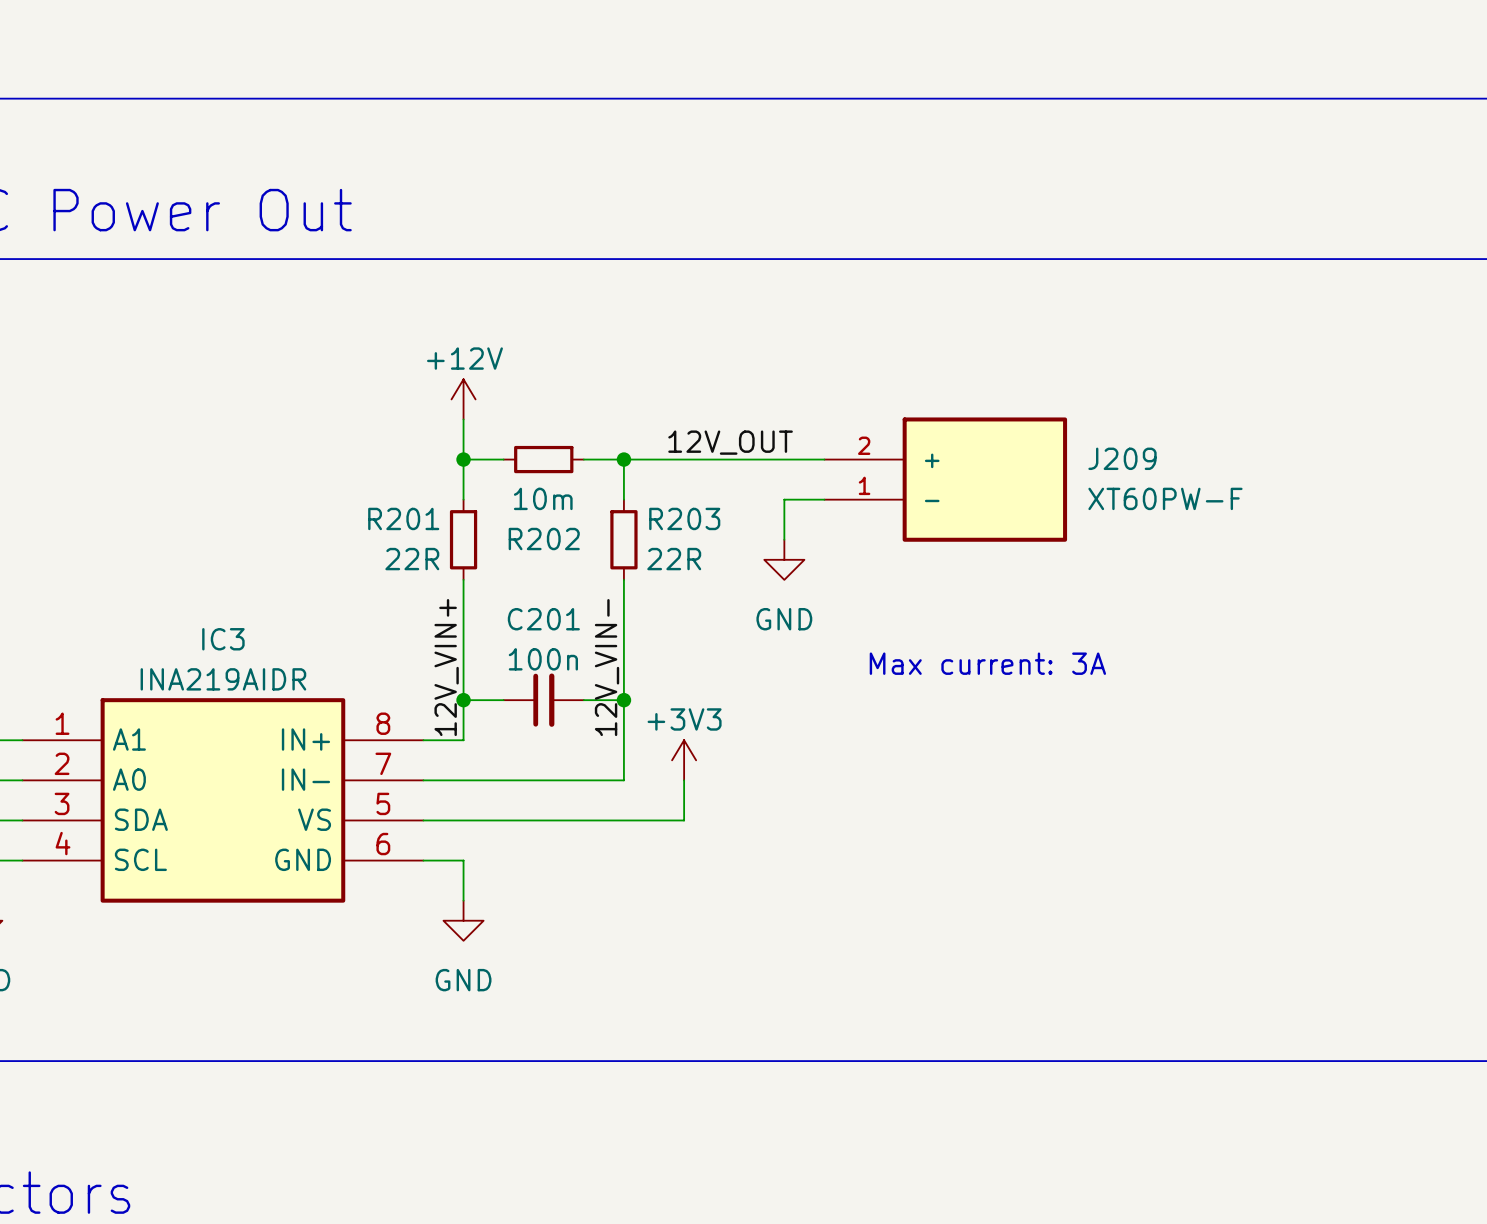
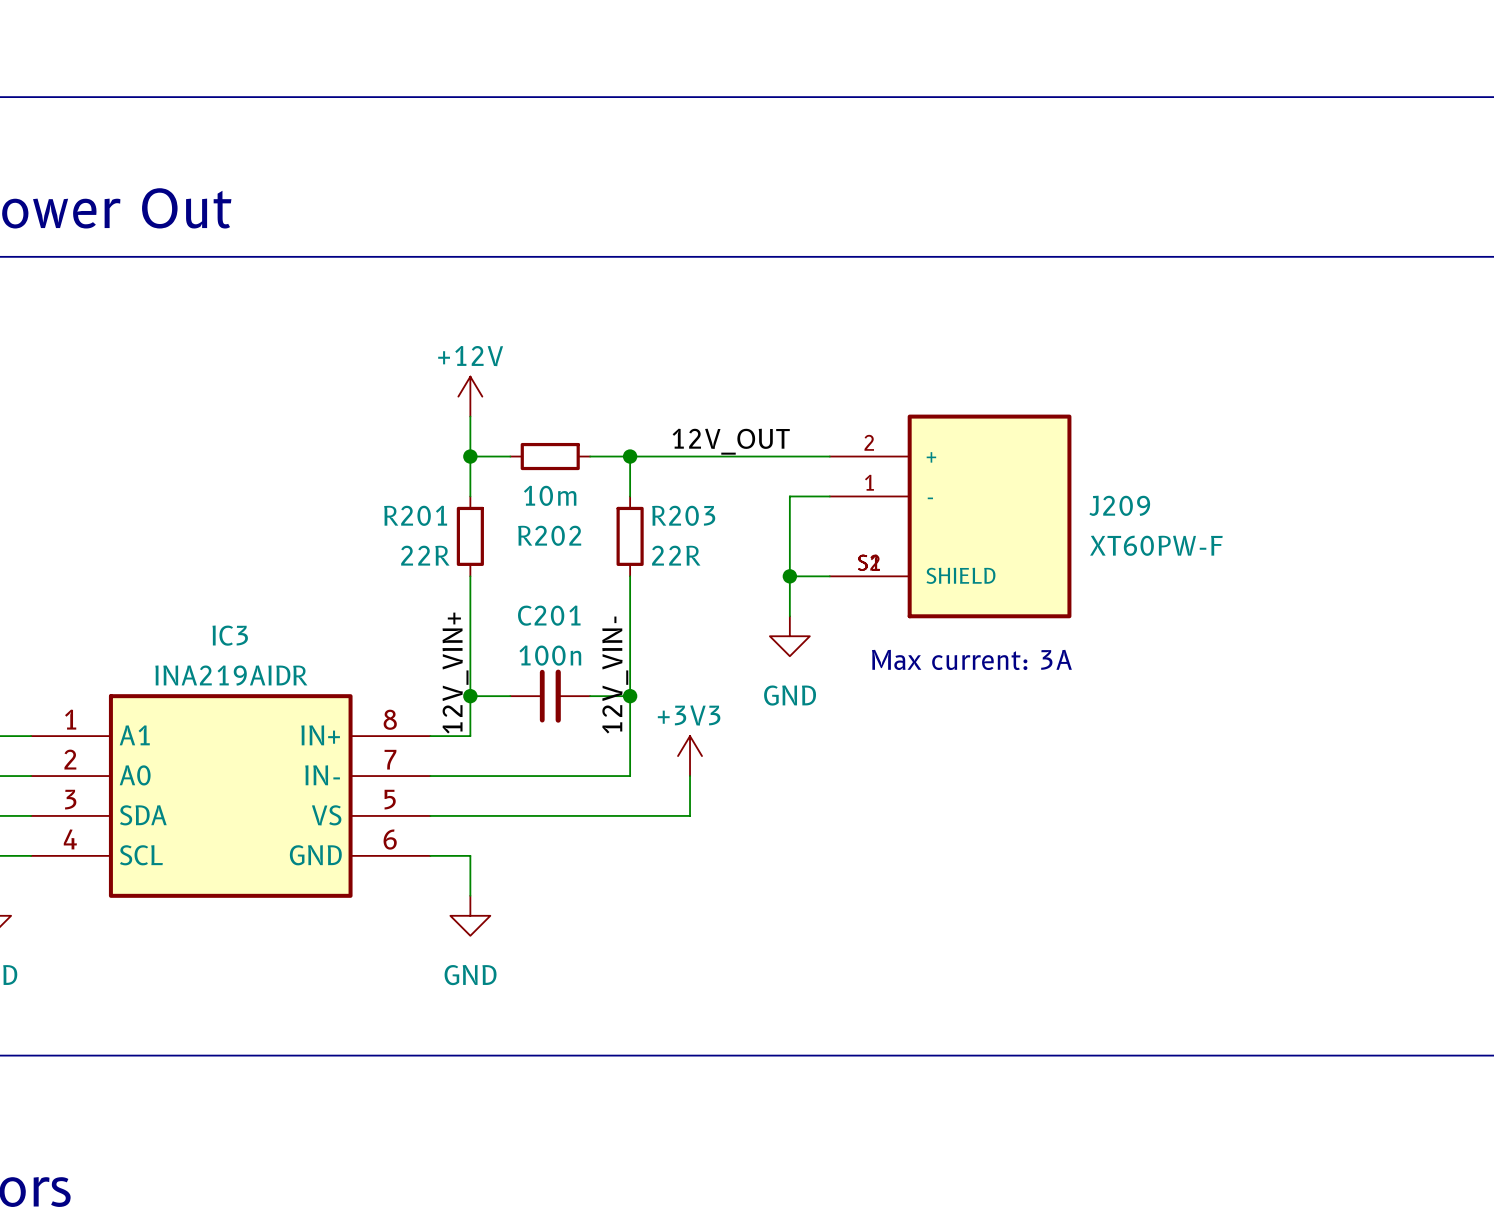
J209 symbol: [824, 417, 1068, 542] -> [829, 414, 1072, 619]
wire: none -> (789, 536) (789, 616)
power symbol position: GND (784, 559) -> GND (789, 636)
wire: none -> (789, 576) (829, 576)
junction: none -> (789, 576)

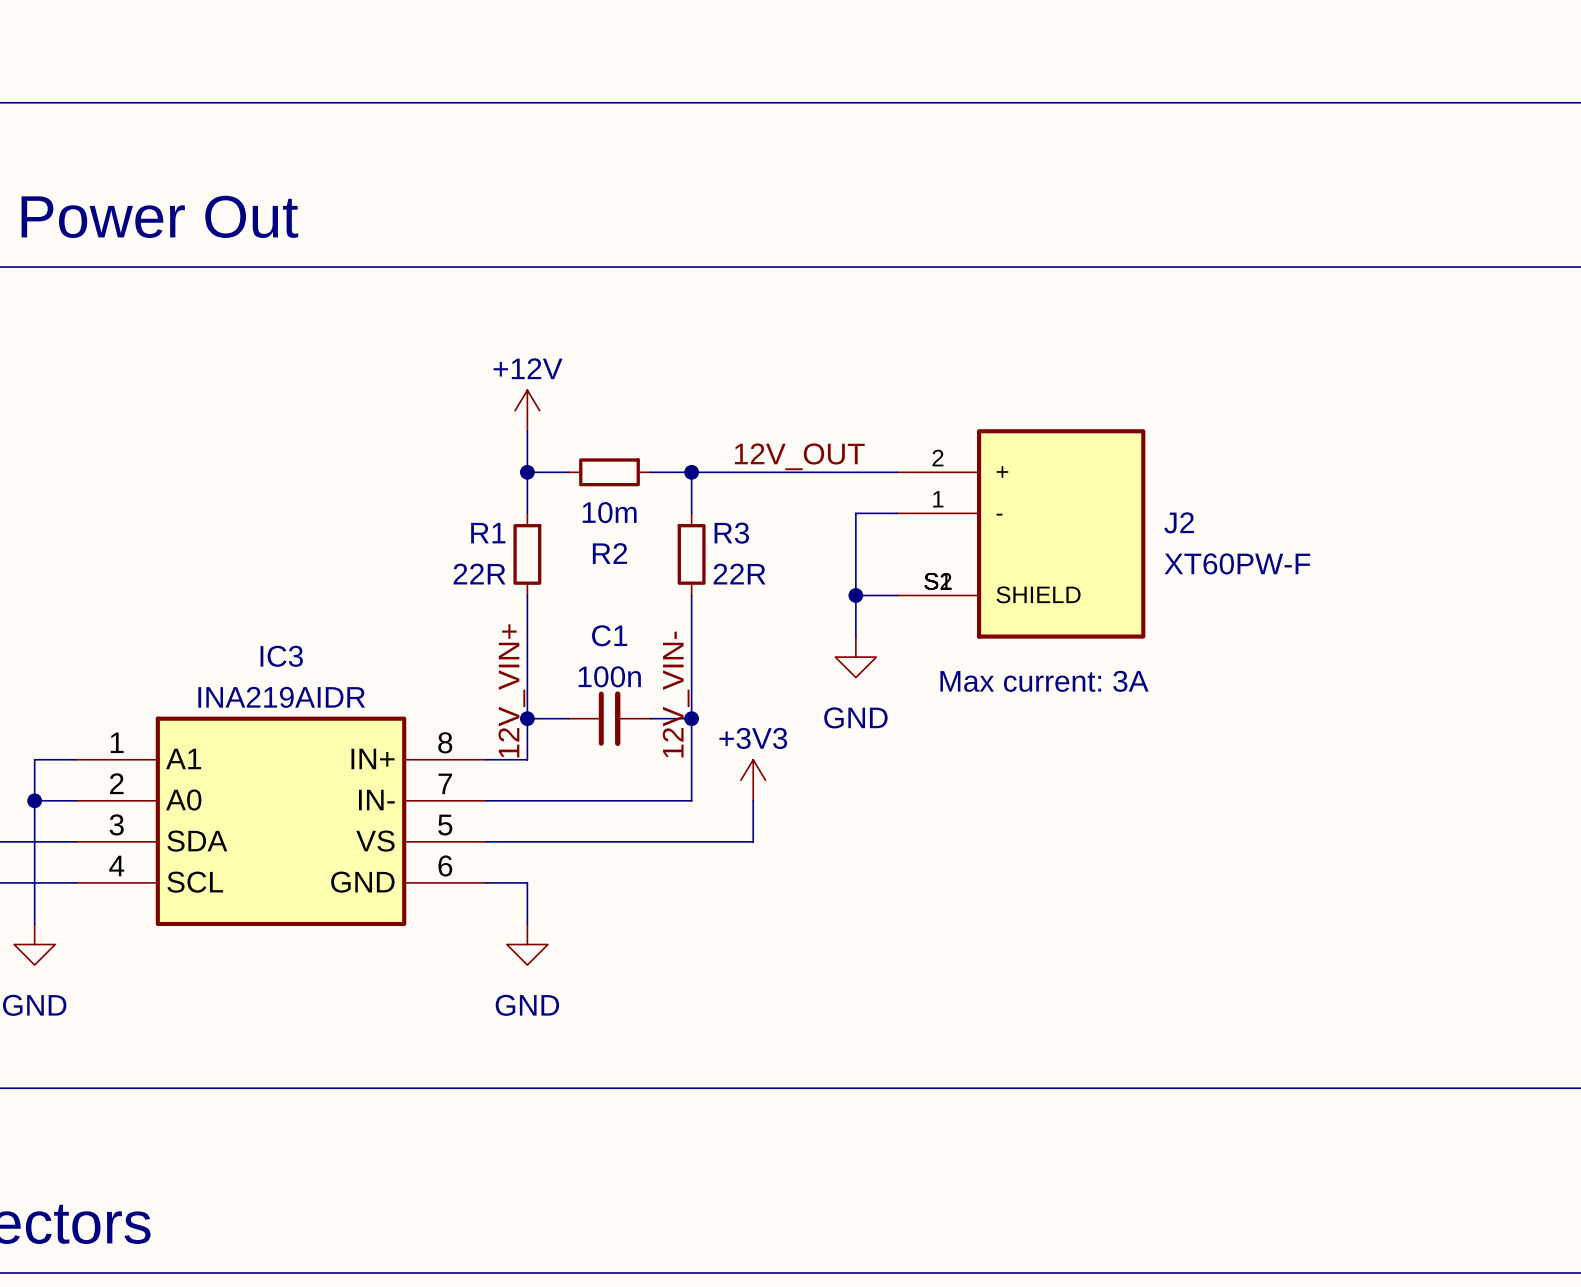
J209 name: J209 (1119, 505) -> J2 (1179, 522)
R201 name: R201 (415, 515) -> R1 (488, 533)
R203 name: R203 (683, 515) -> R3 (731, 533)
R202 name: R202 (549, 535) -> R2 (609, 553)
C201 name: C201 (549, 615) -> C1 (609, 635)

